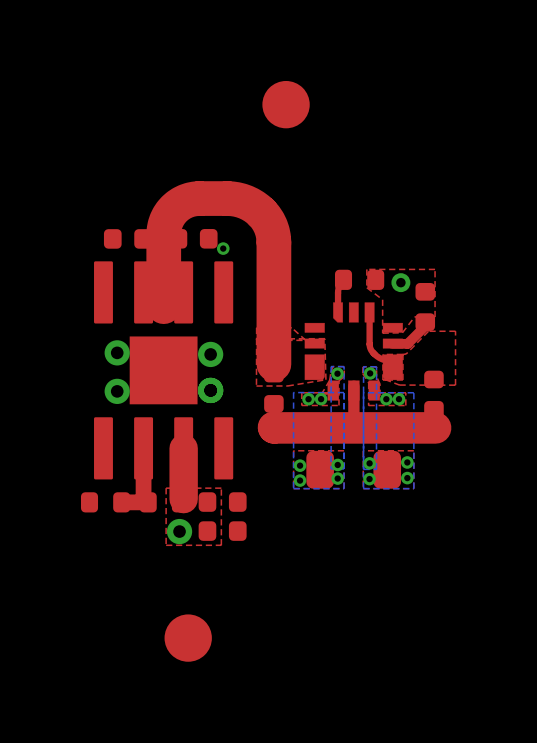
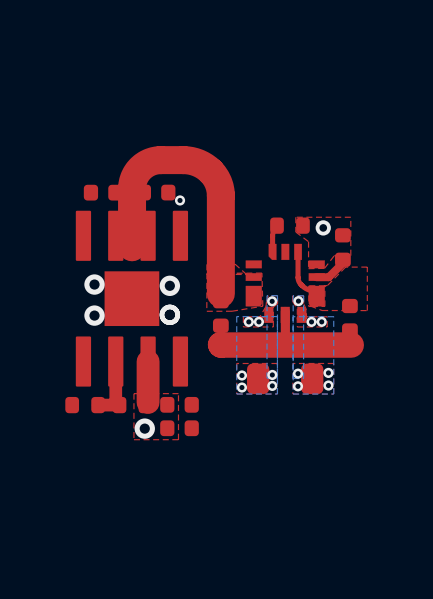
part: (286, 104) -> none
part: (188, 638) -> none

